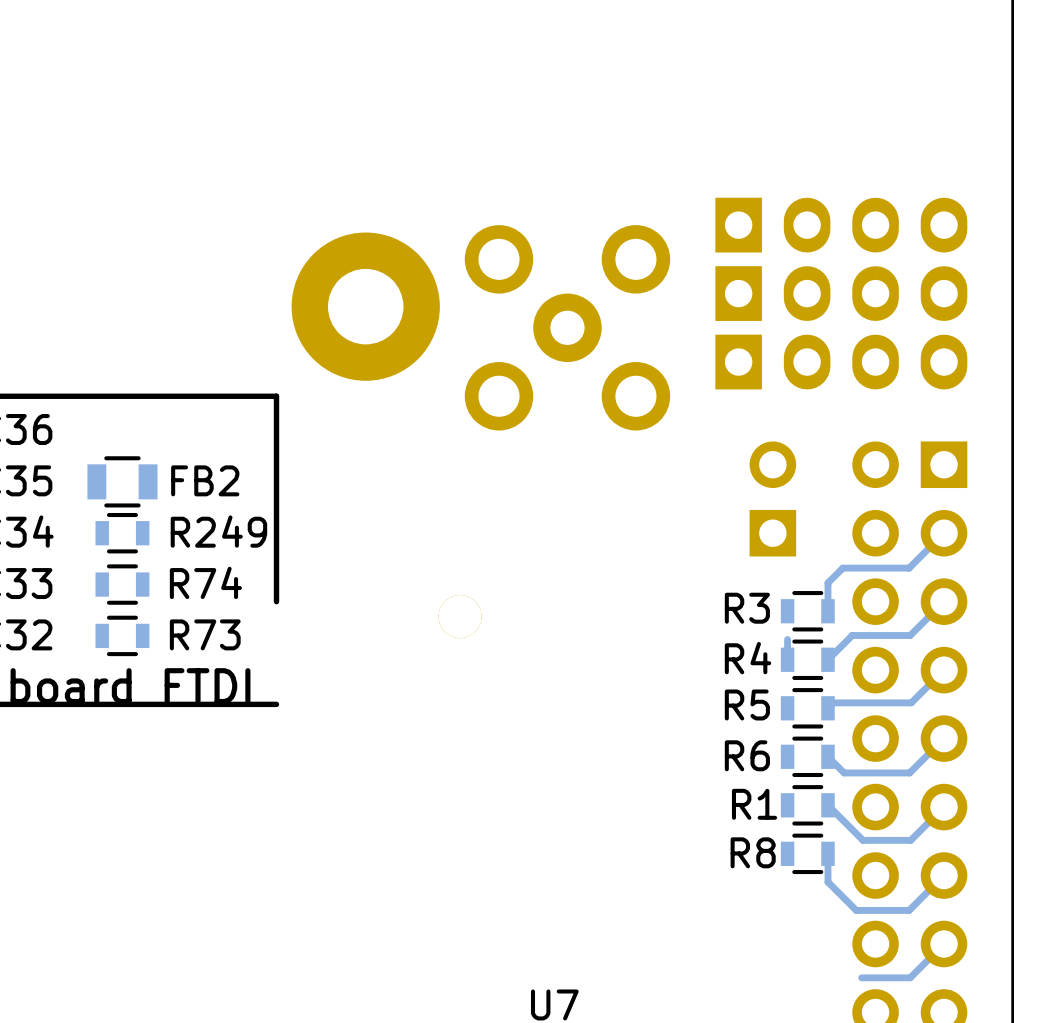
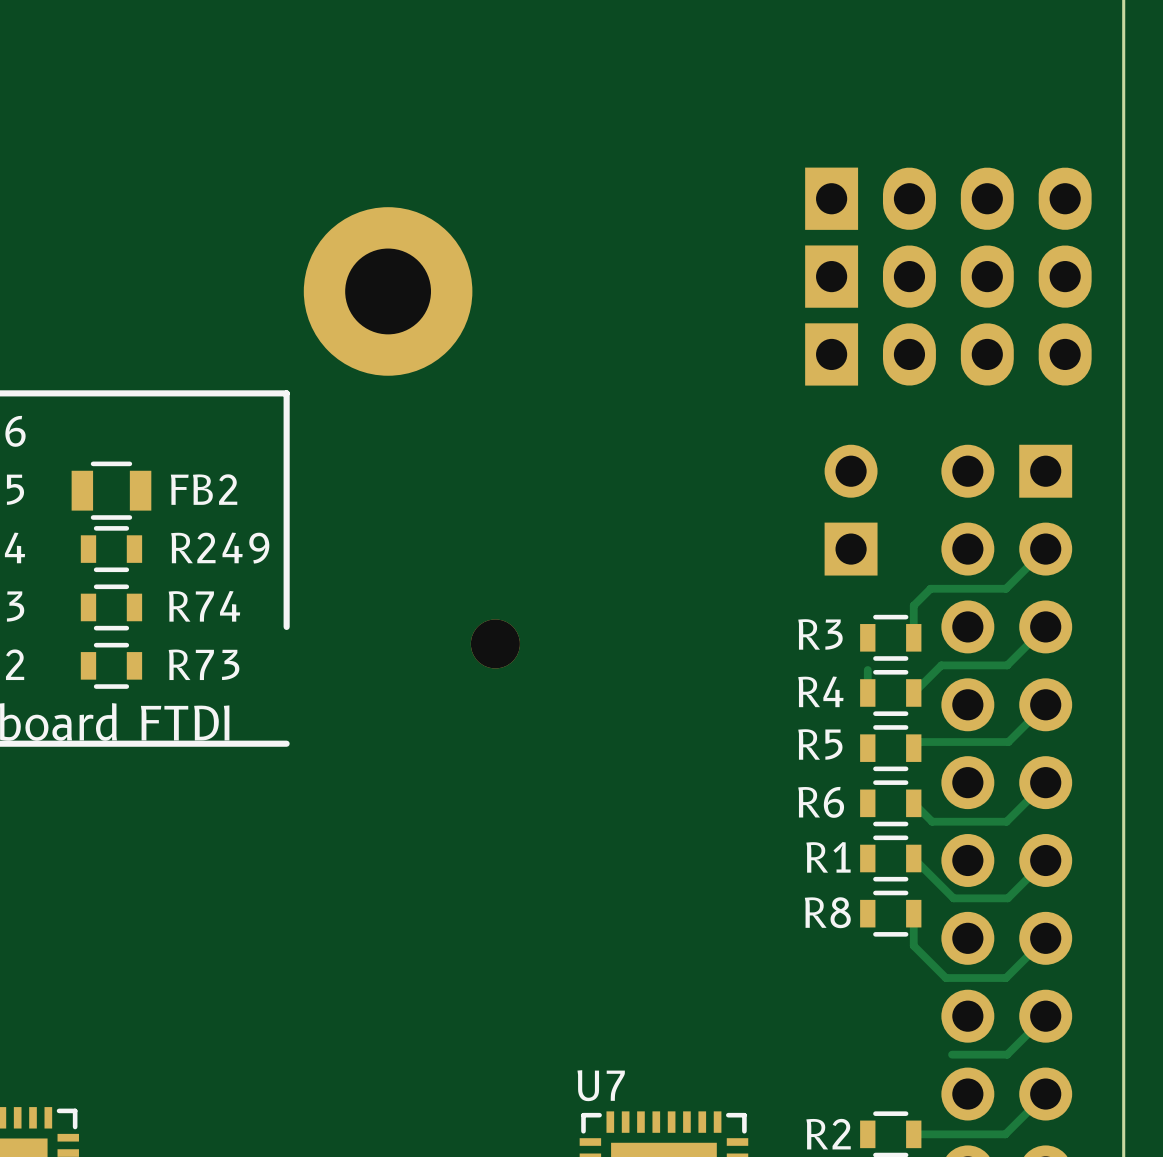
part position: (841, 225) -> (948, 198)
part position: (841, 293) -> (948, 276)
part: (567, 327) -> none
part position: (841, 362) -> (948, 354)

